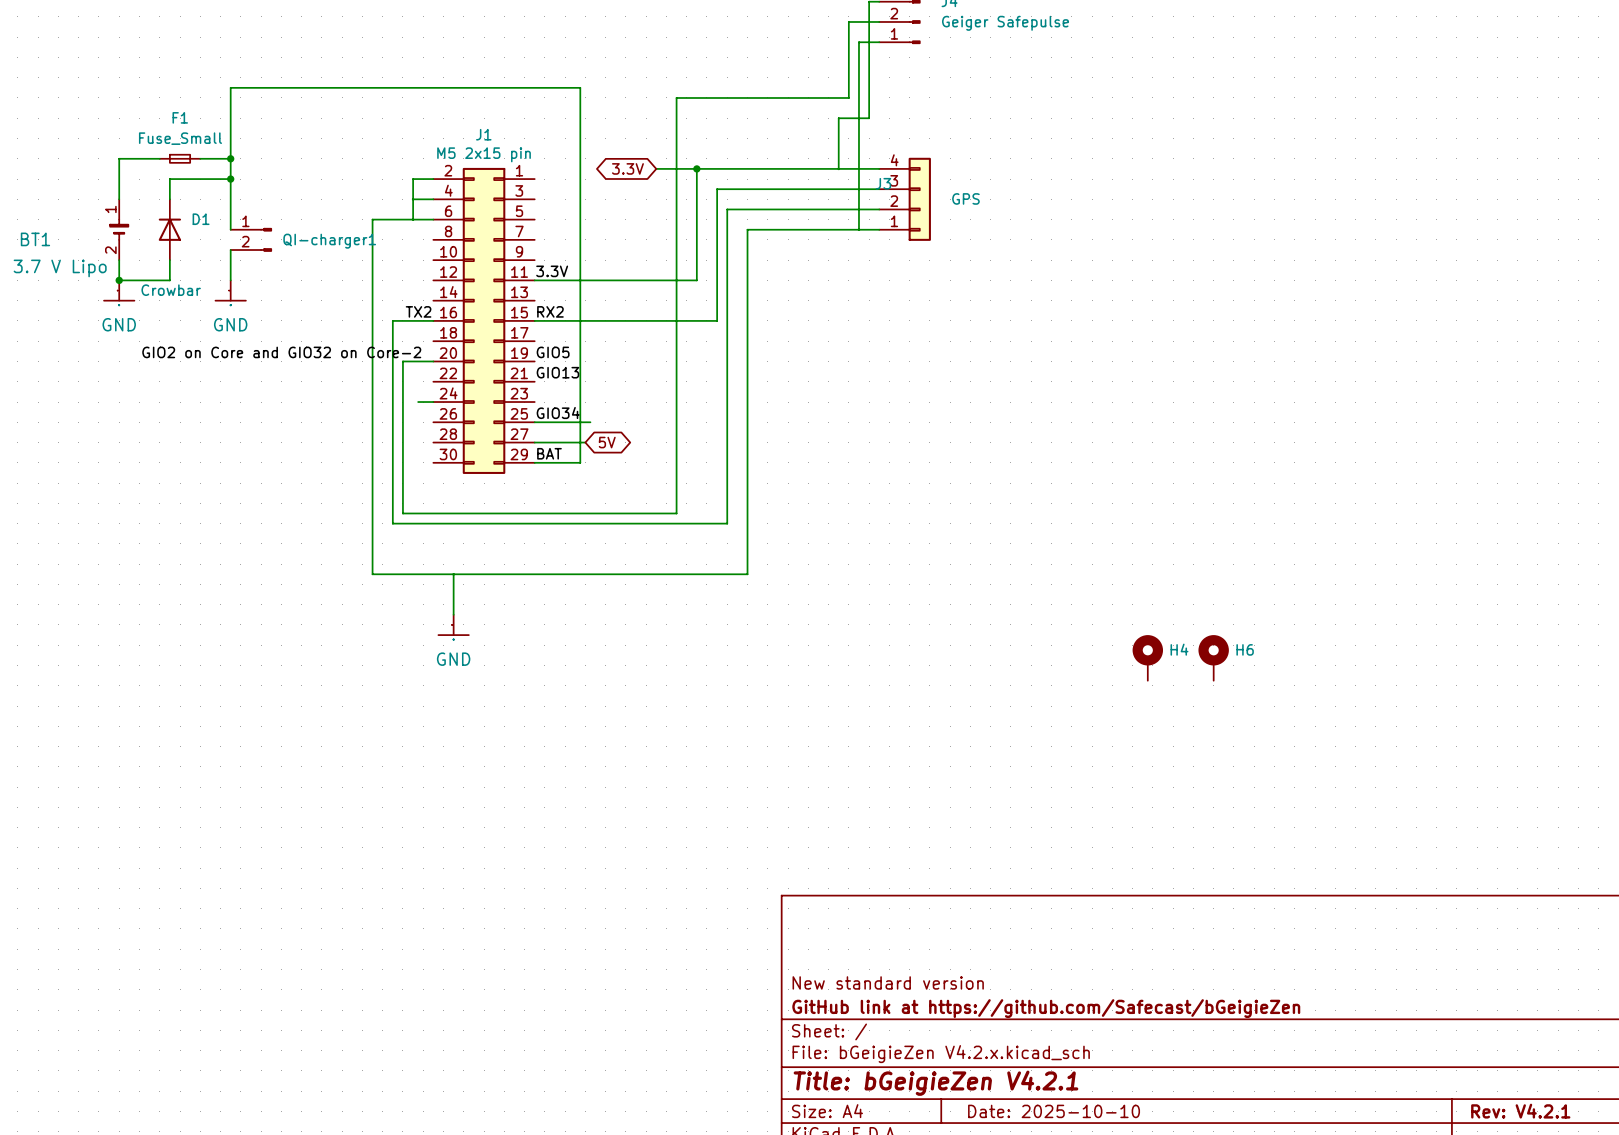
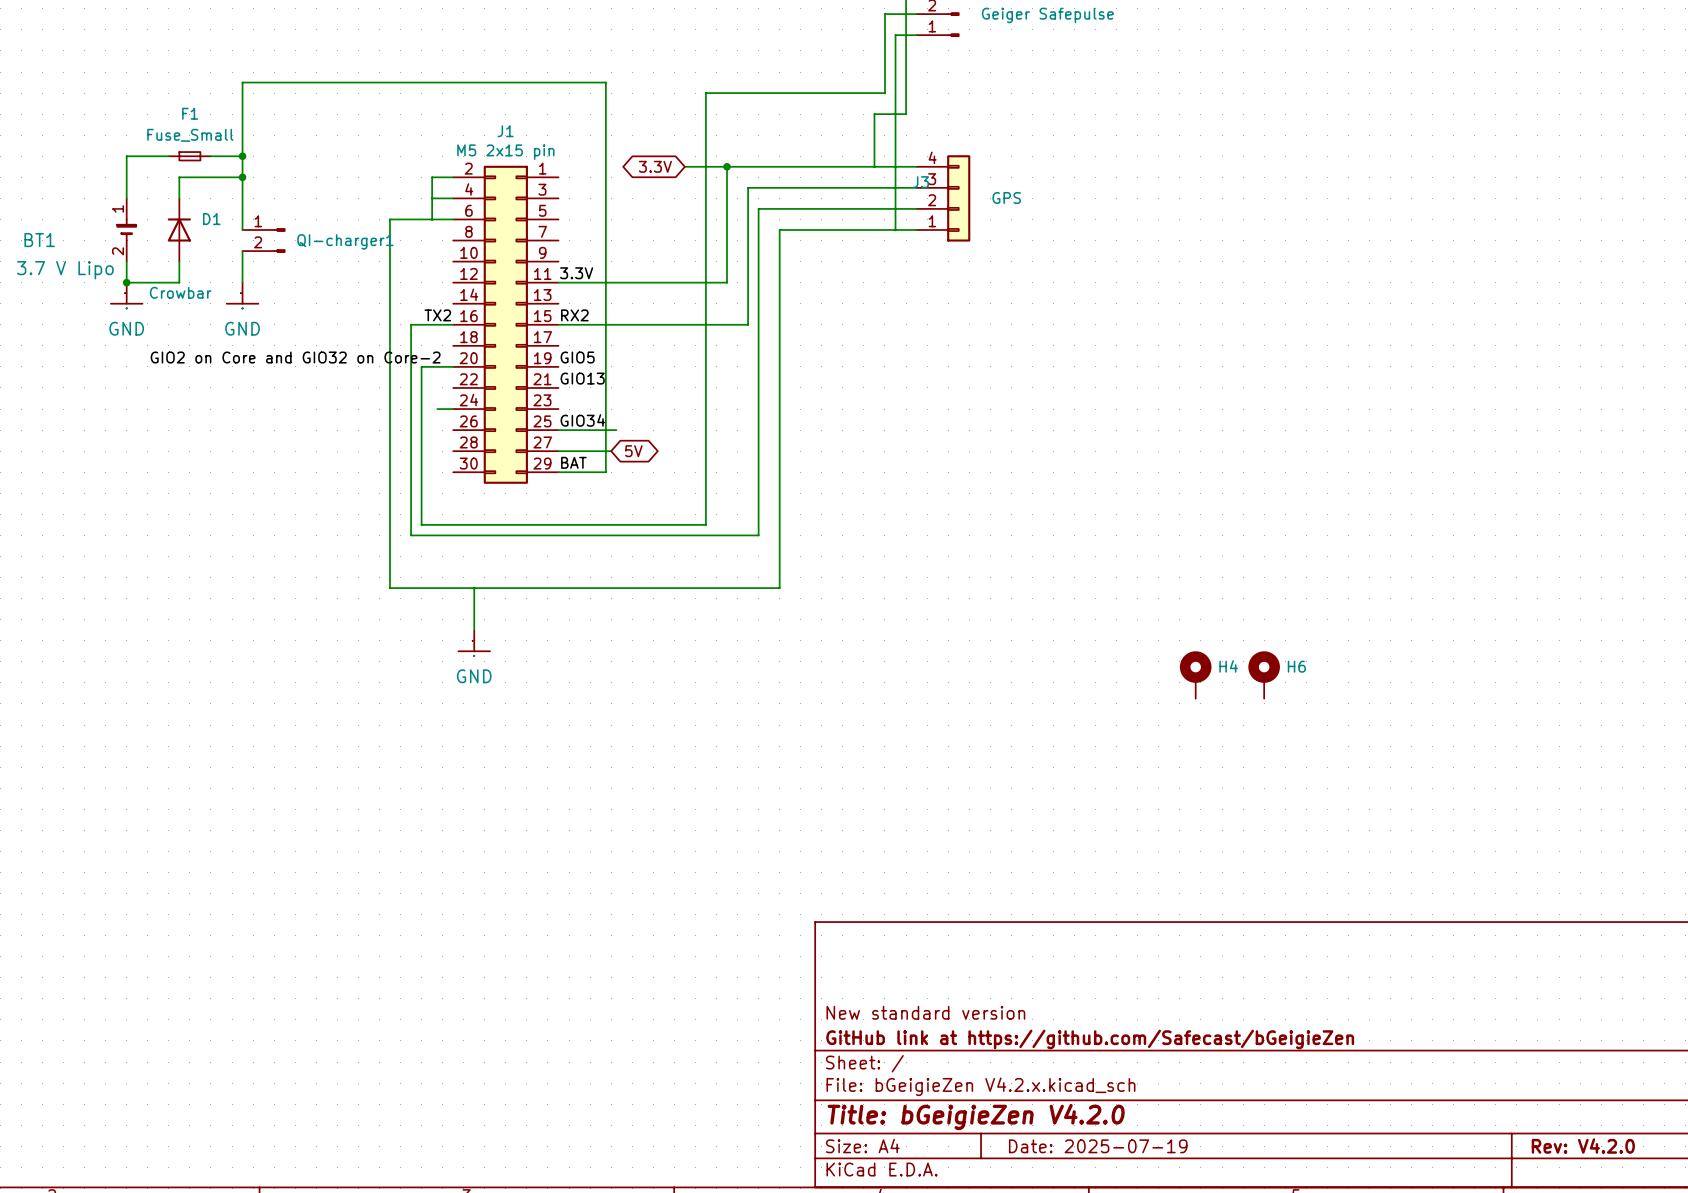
title block: Title: bGeigieZen V4.2.1 (935, 1083) -> Title: bGeigieZen V4.2.0 (976, 1117)
title block: Date: 2025-10-10 (1054, 1111) -> Date: 2025-07-19 (1098, 1146)
title block: Rev: V4.2.1 (1520, 1111) -> Rev: V4.2.0 (1583, 1146)

